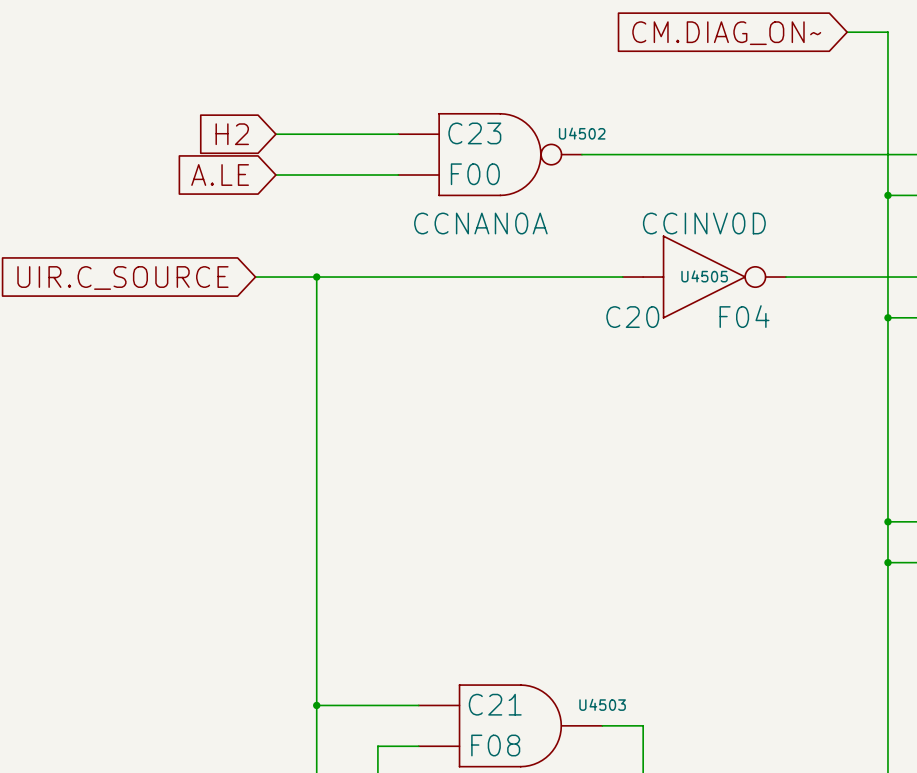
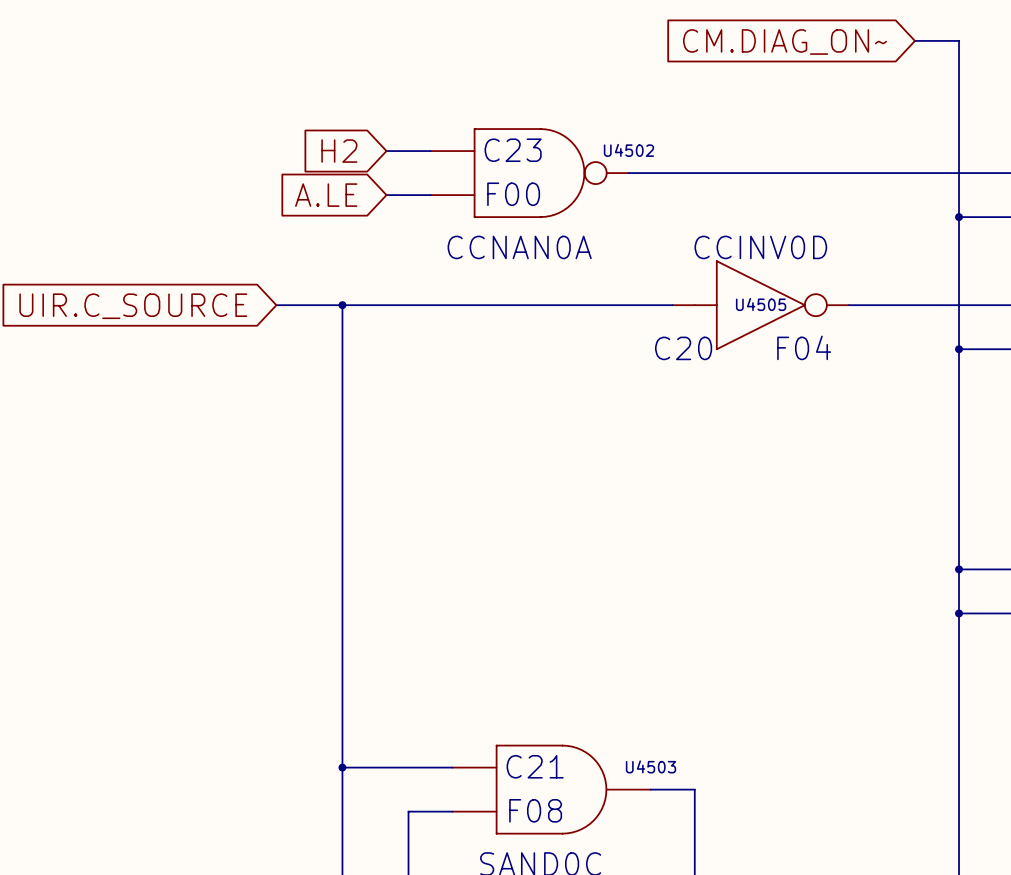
global label position: H2 (232, 134) -> H2 (339, 151)
wire: (275, 134) (357, 134) -> none
global label position: A.LE (220, 175) -> A.LE (326, 195)
wire: (275, 175) (357, 175) -> none

